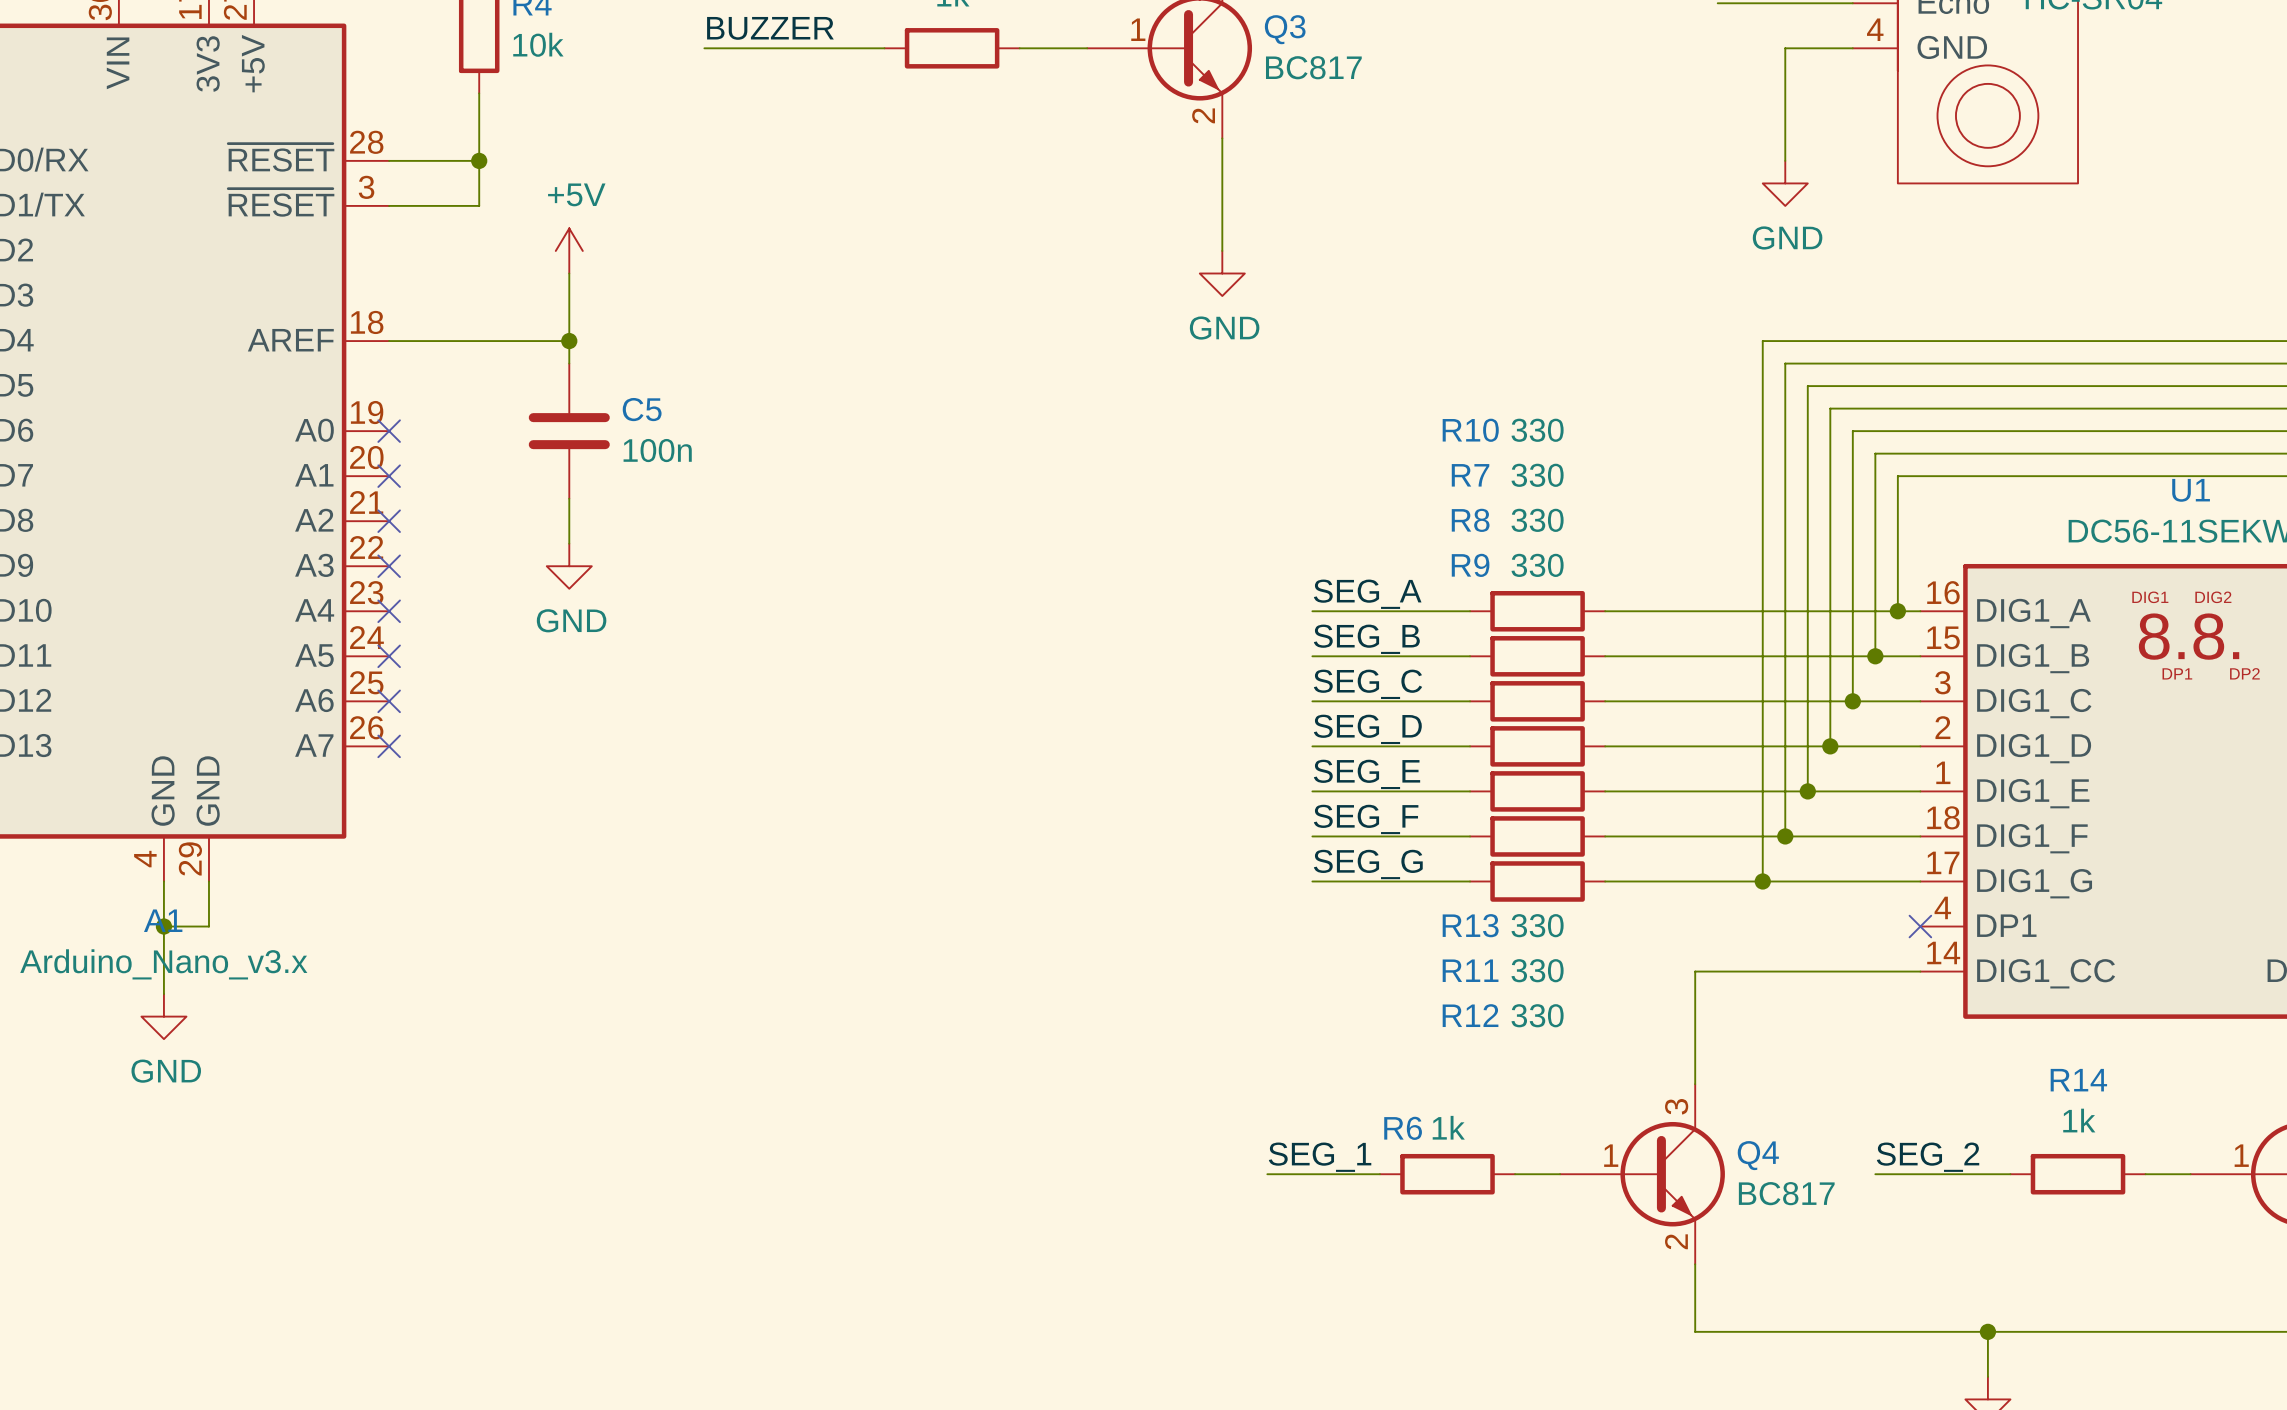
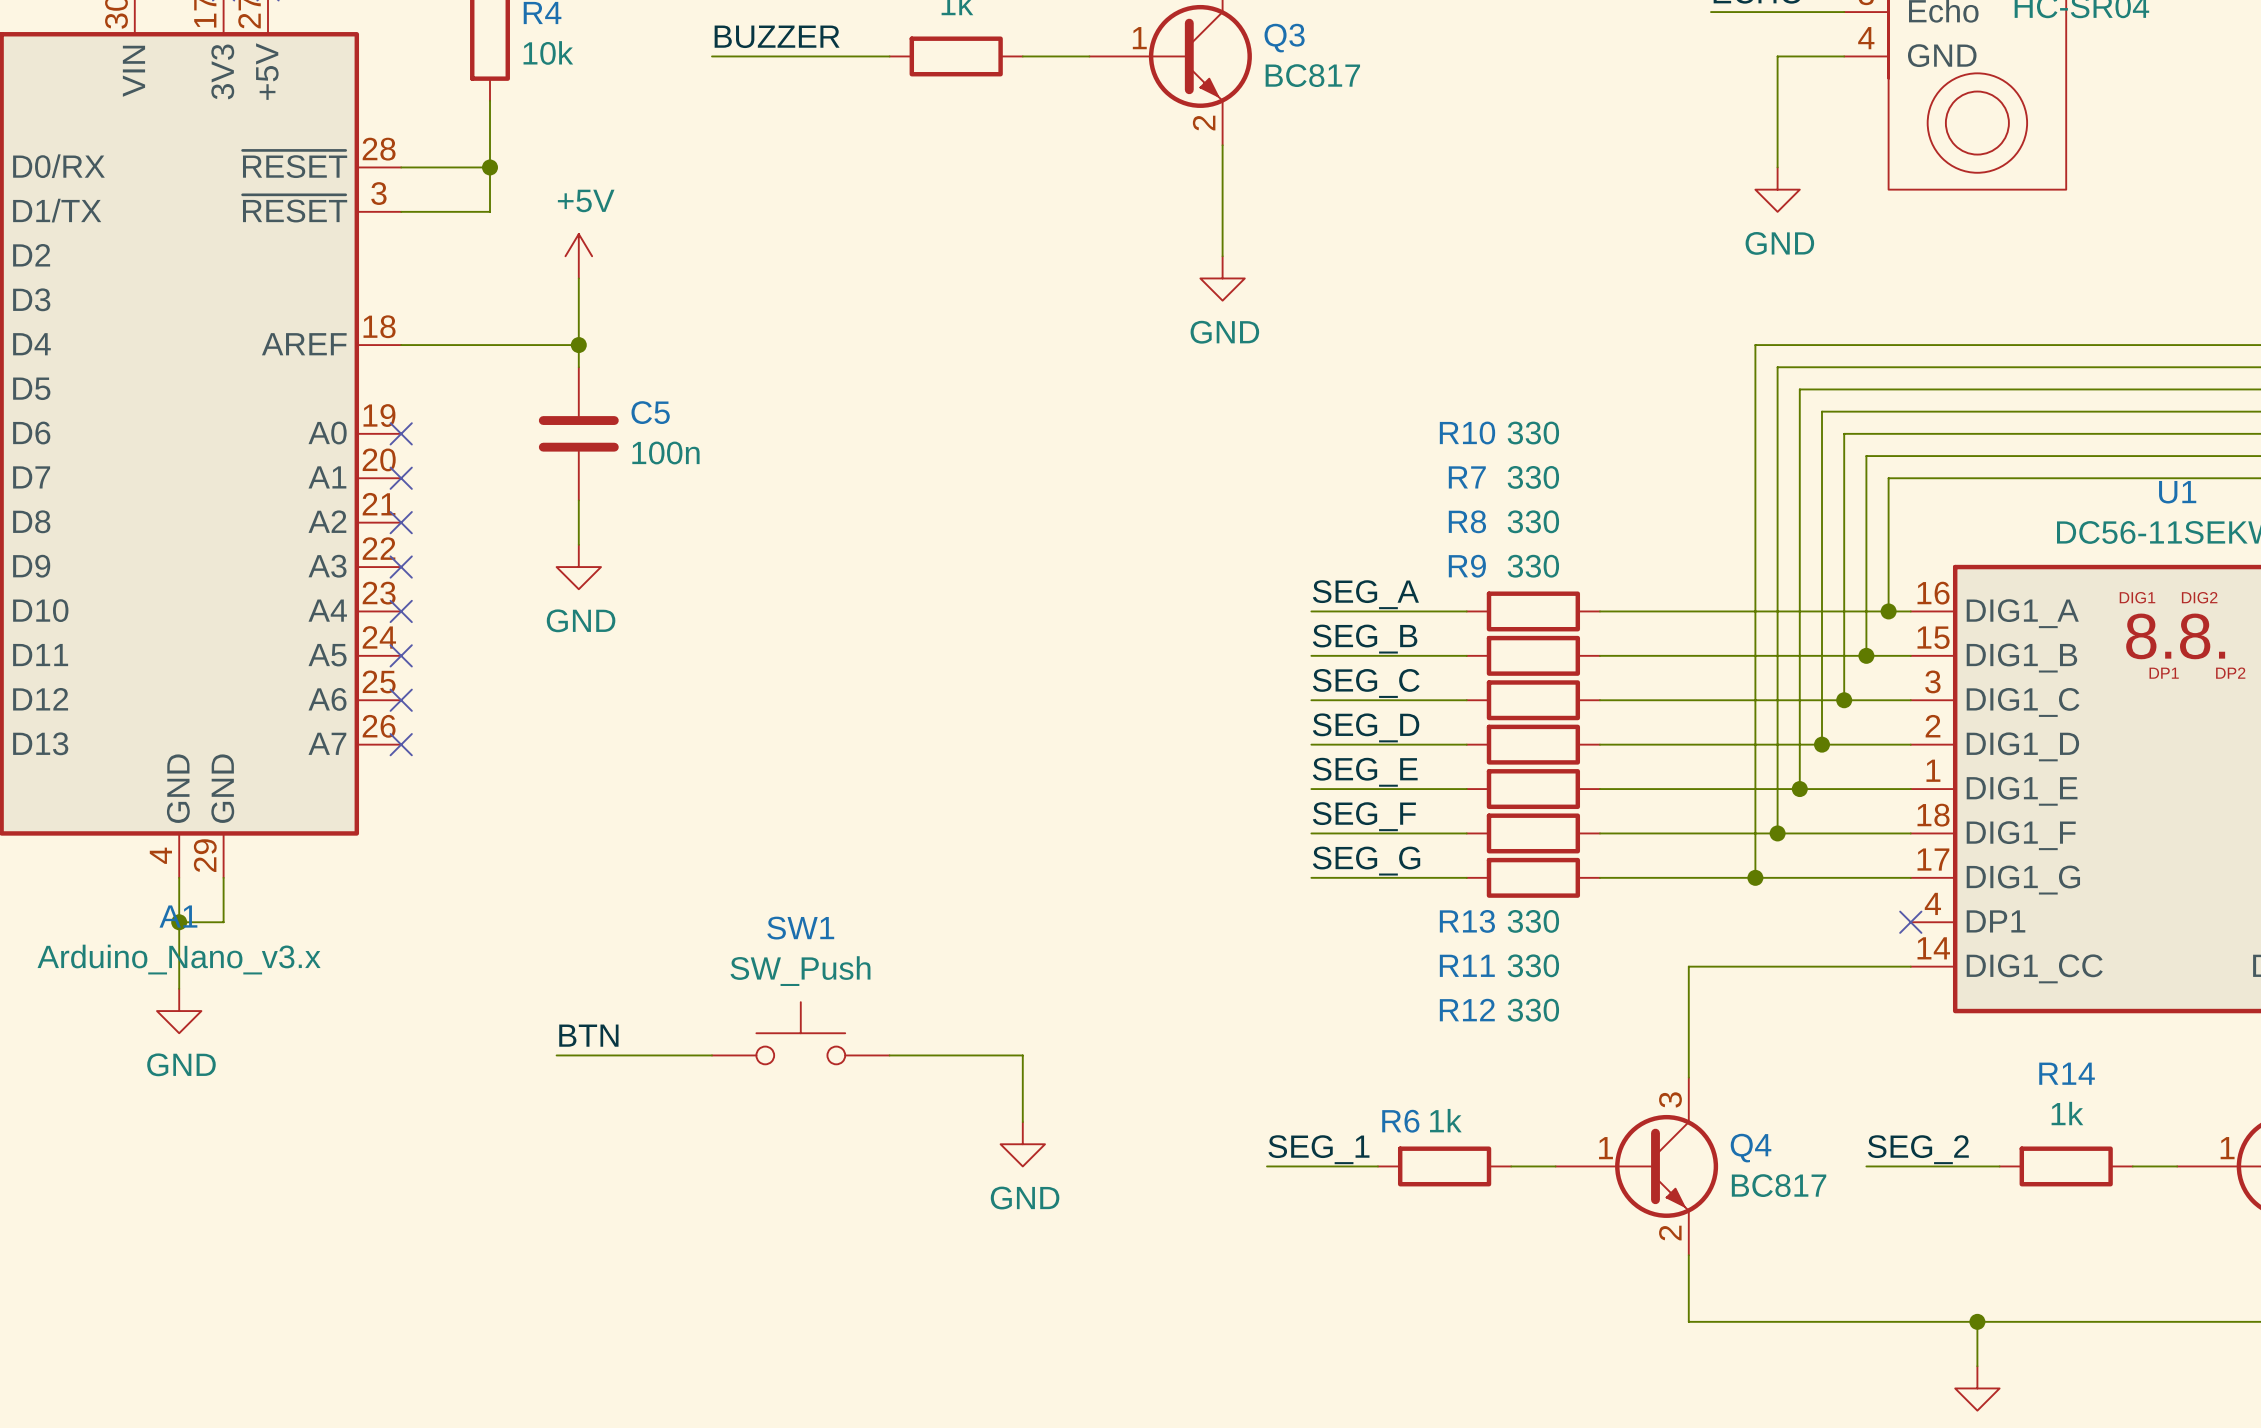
SW1: none -> SW_Push (800, 1033)
label: none -> BTN (588, 1035)
wire: none -> (556, 1055) (712, 1055)
wire: none -> (889, 1055) (1022, 1055) (1022, 1122)
power symbol: none -> GND (1022, 1144)

